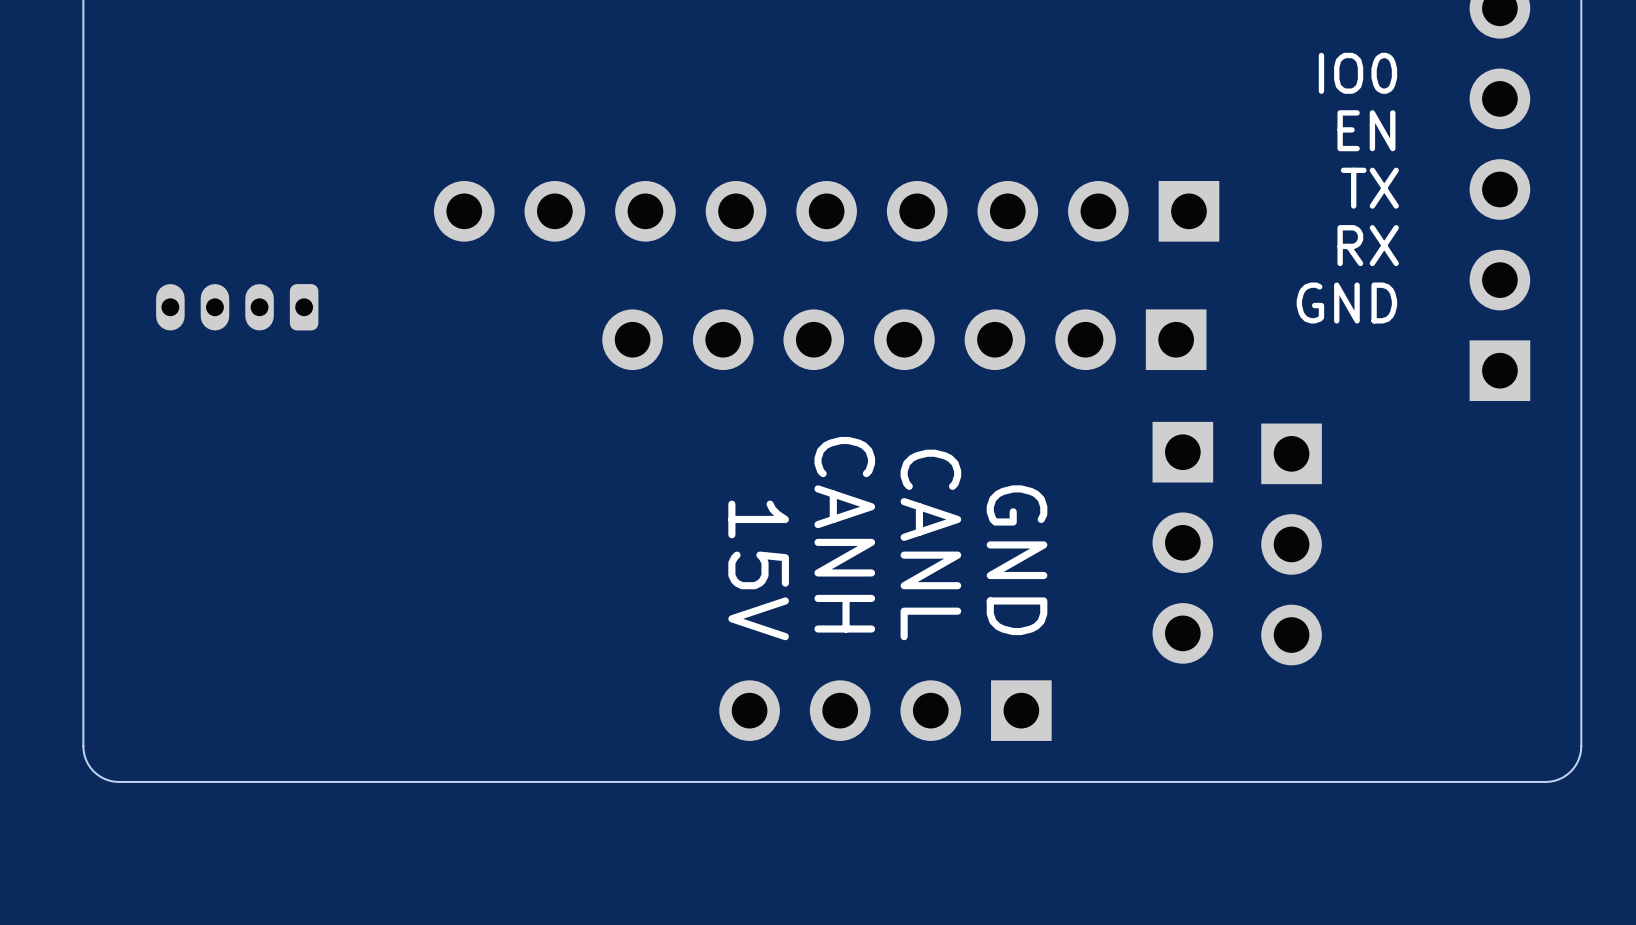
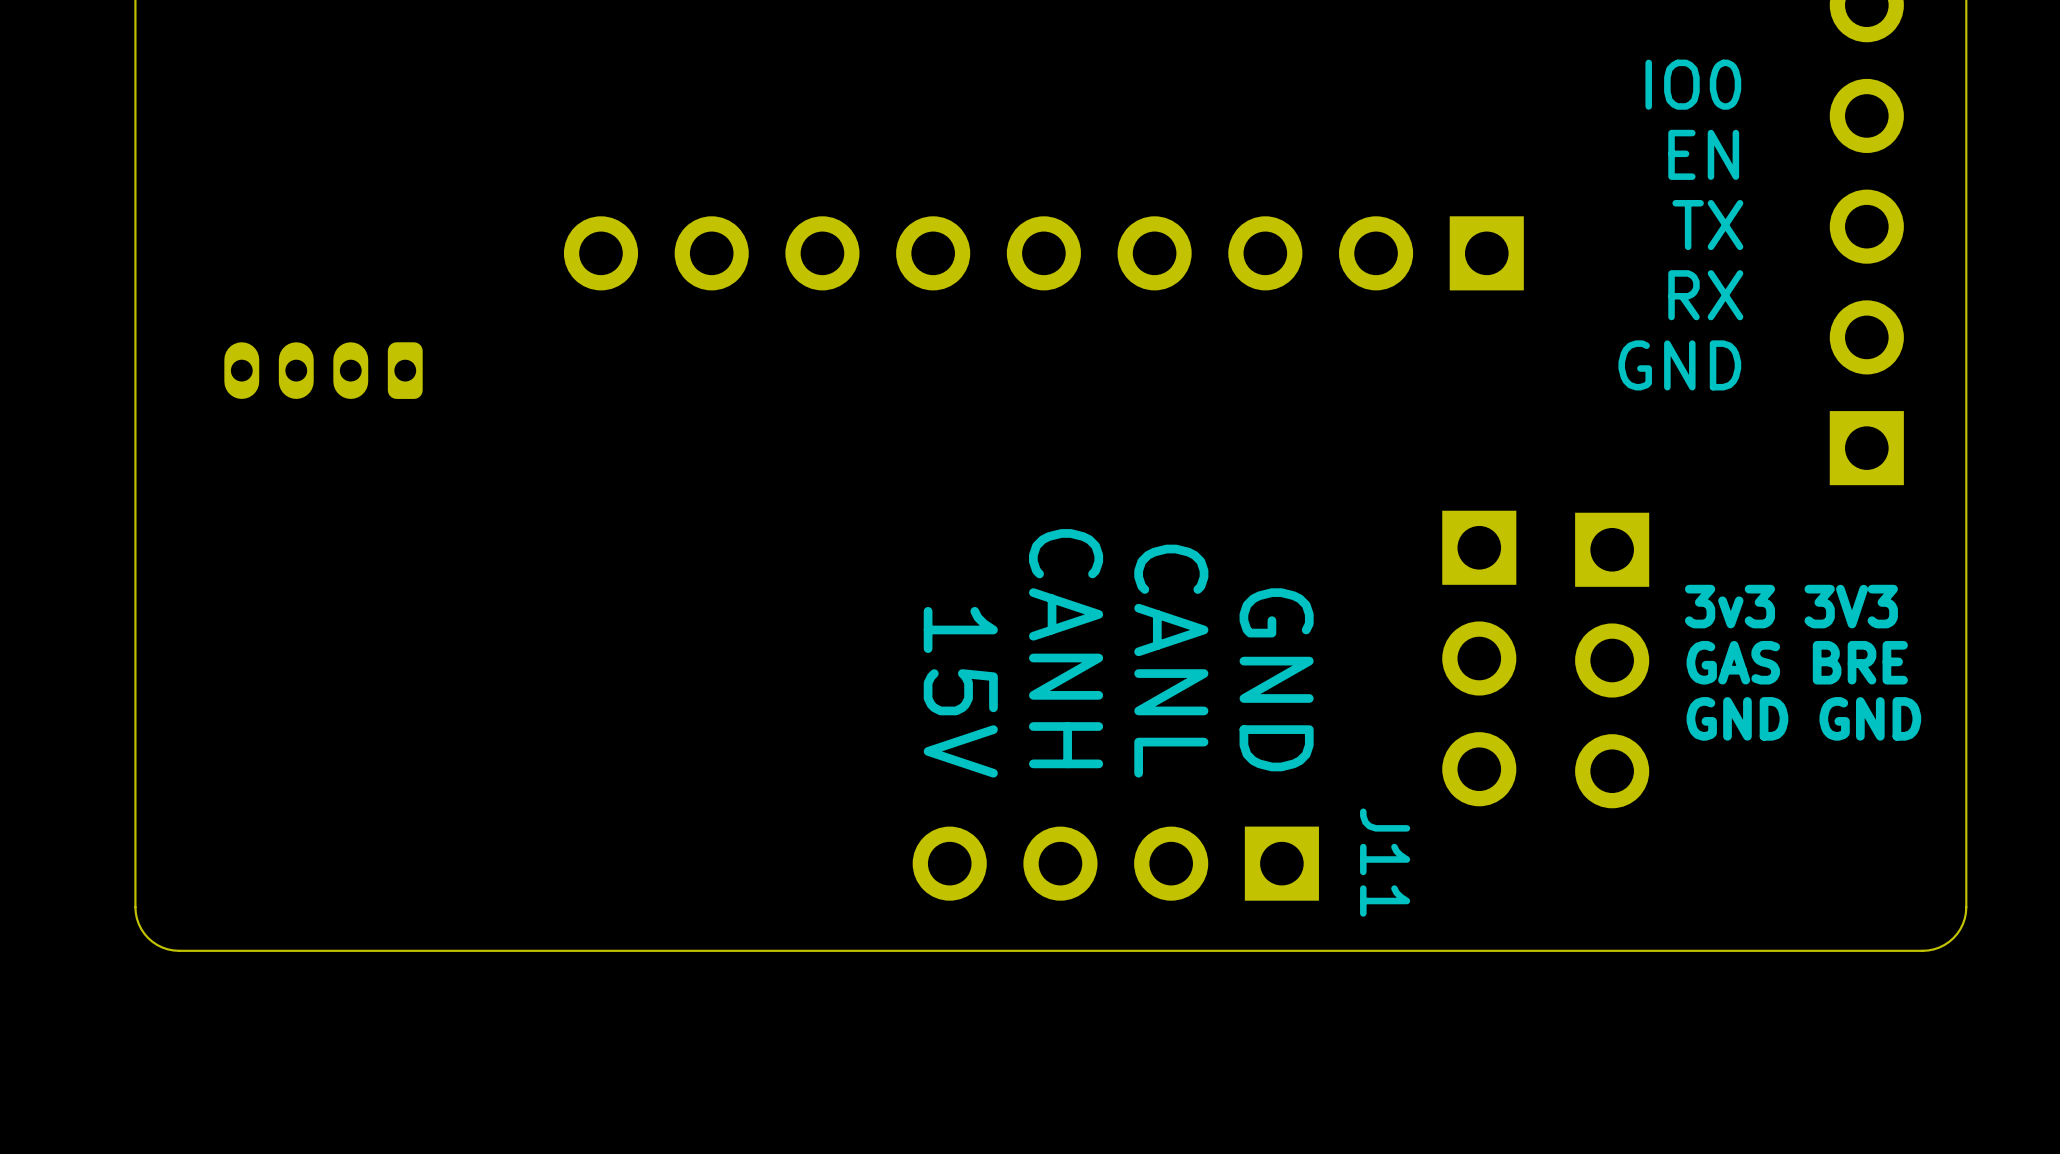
part: (904, 339) -> none
text: none -> 3v3 3V3 (1791, 606)
text: none -> GAS BRE (1797, 662)
text: none -> GND GND (1803, 718)
J11 name: none -> J11 (1385, 862)

